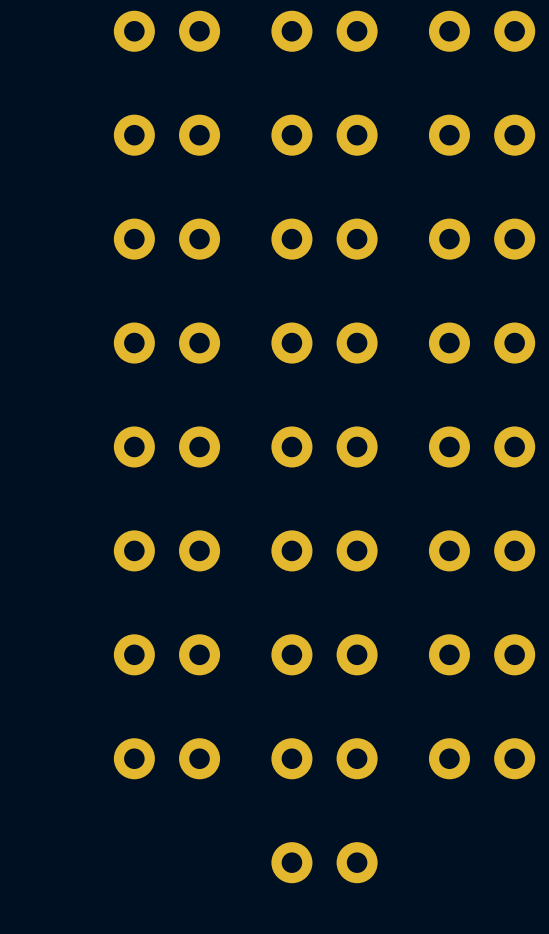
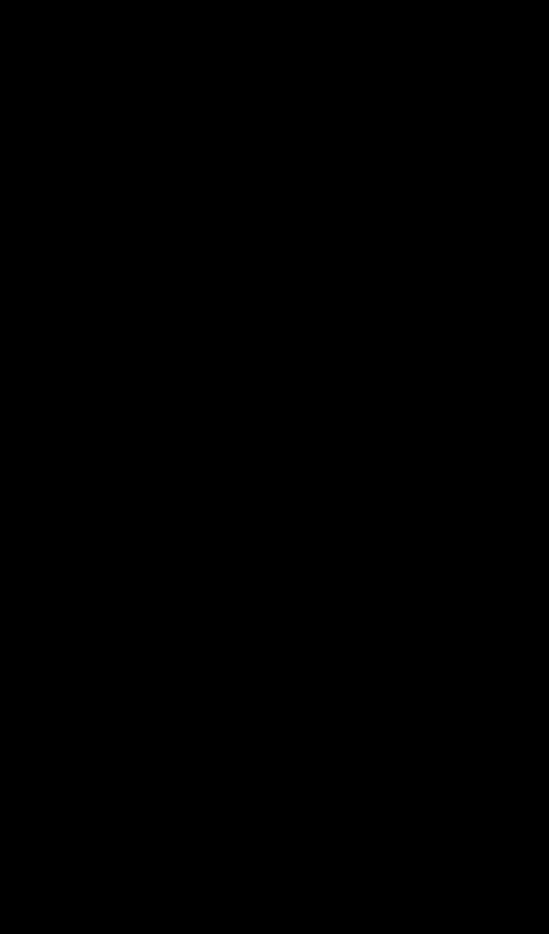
part: (166, 31) -> none
part: (324, 31) -> none
part: (482, 31) -> none
part: (166, 135) -> none
part: (324, 135) -> none
part: (482, 135) -> none
part: (166, 239) -> none
part: (324, 239) -> none
part: (482, 239) -> none
part: (166, 343) -> none
part: (324, 343) -> none
part: (482, 343) -> none
part: (166, 446) -> none
part: (324, 446) -> none
part: (482, 446) -> none
part: (166, 550) -> none
part: (324, 550) -> none
part: (482, 550) -> none
part: (166, 654) -> none
part: (324, 654) -> none
part: (482, 654) -> none
part: (166, 758) -> none
part: (324, 758) -> none
part: (482, 758) -> none
part: (324, 862) -> none

